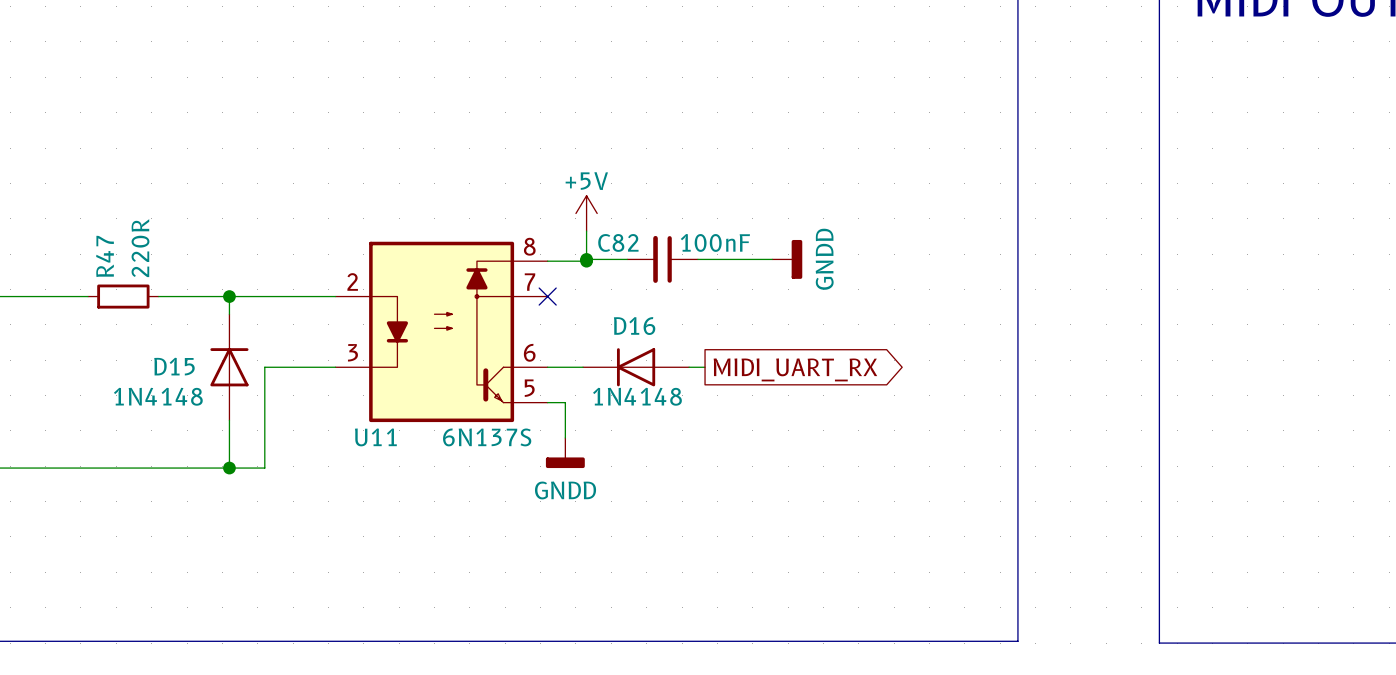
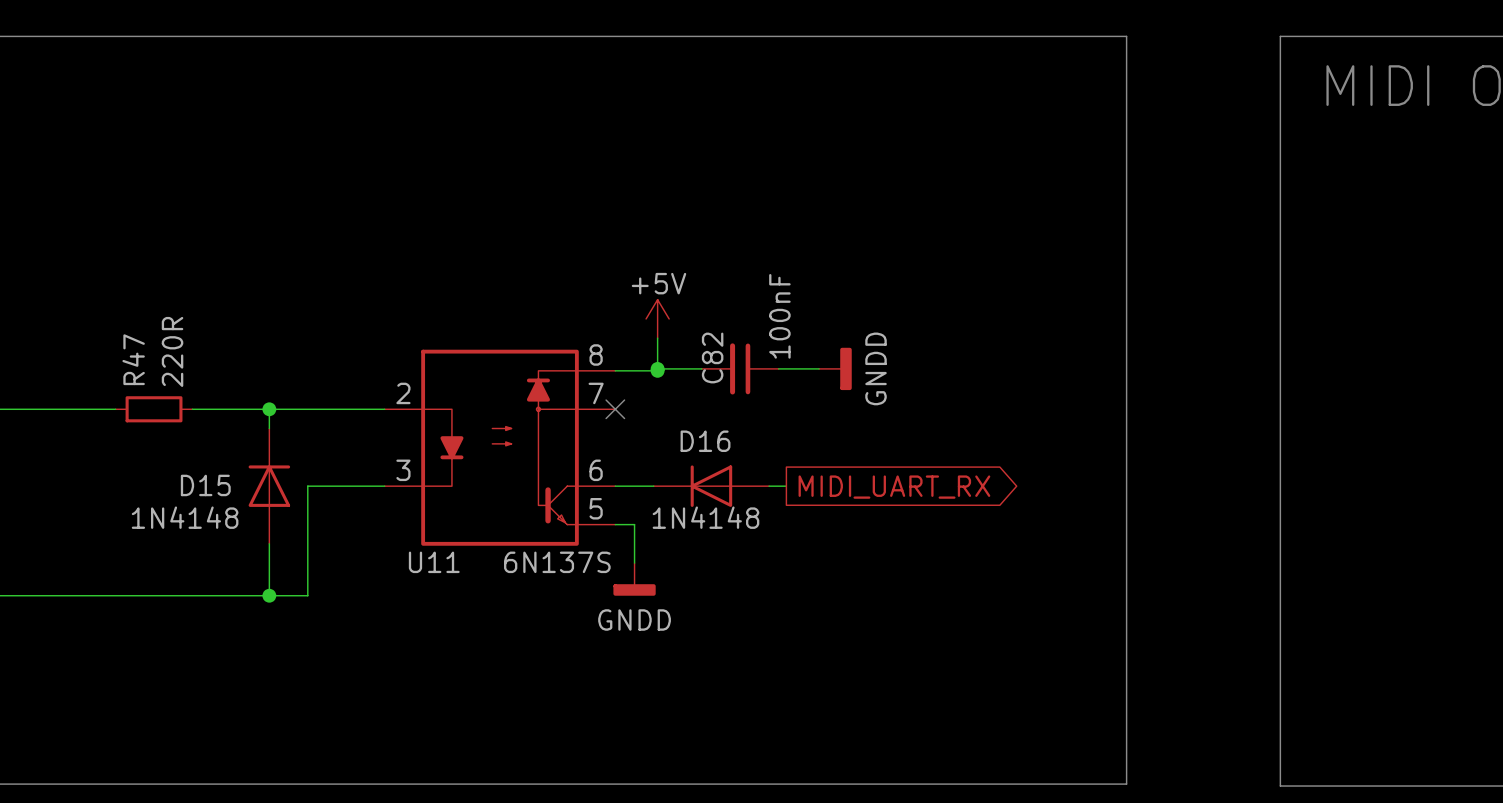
C82 name rotation: 0° (618, 242) -> 90° counterclockwise (712, 357)
C82 value rotation: 0° (715, 242) -> 90° counterclockwise (779, 316)
power symbol position: GNDD (787, 259) -> GNDD (835, 368)

